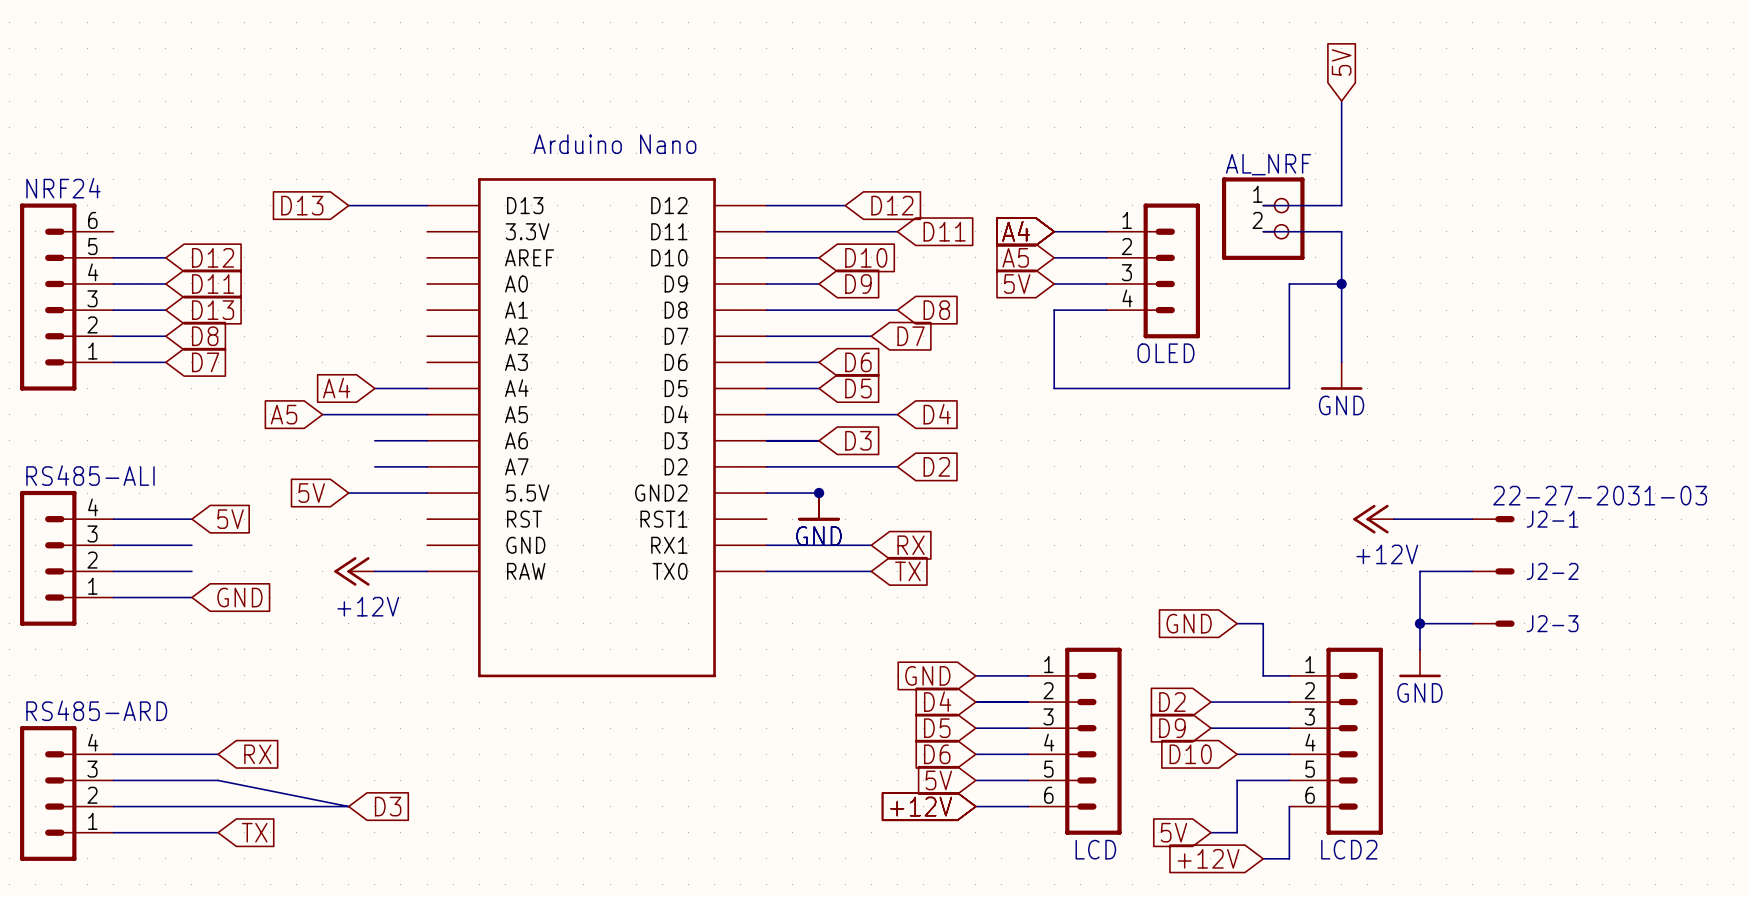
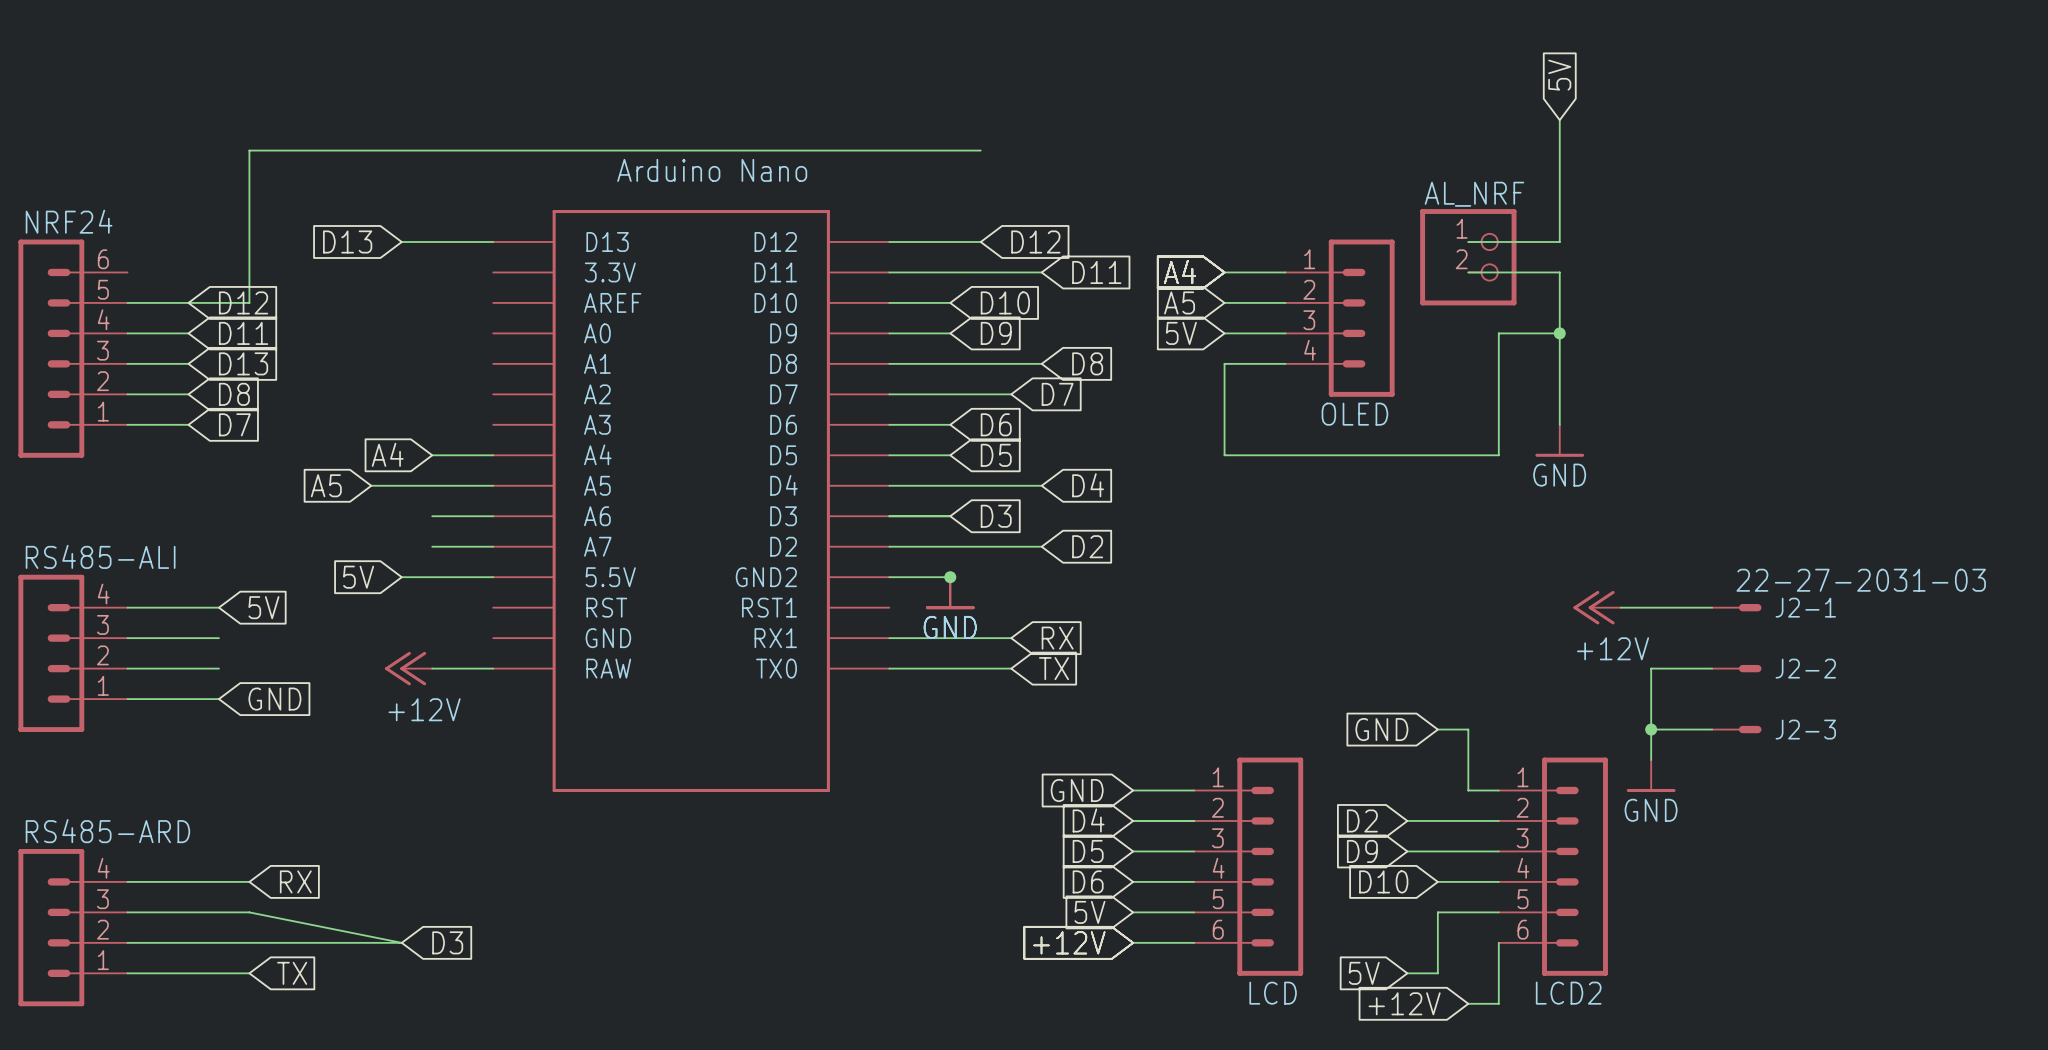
wire: none -> (980, 150) (249, 150) (249, 302) (188, 302)

